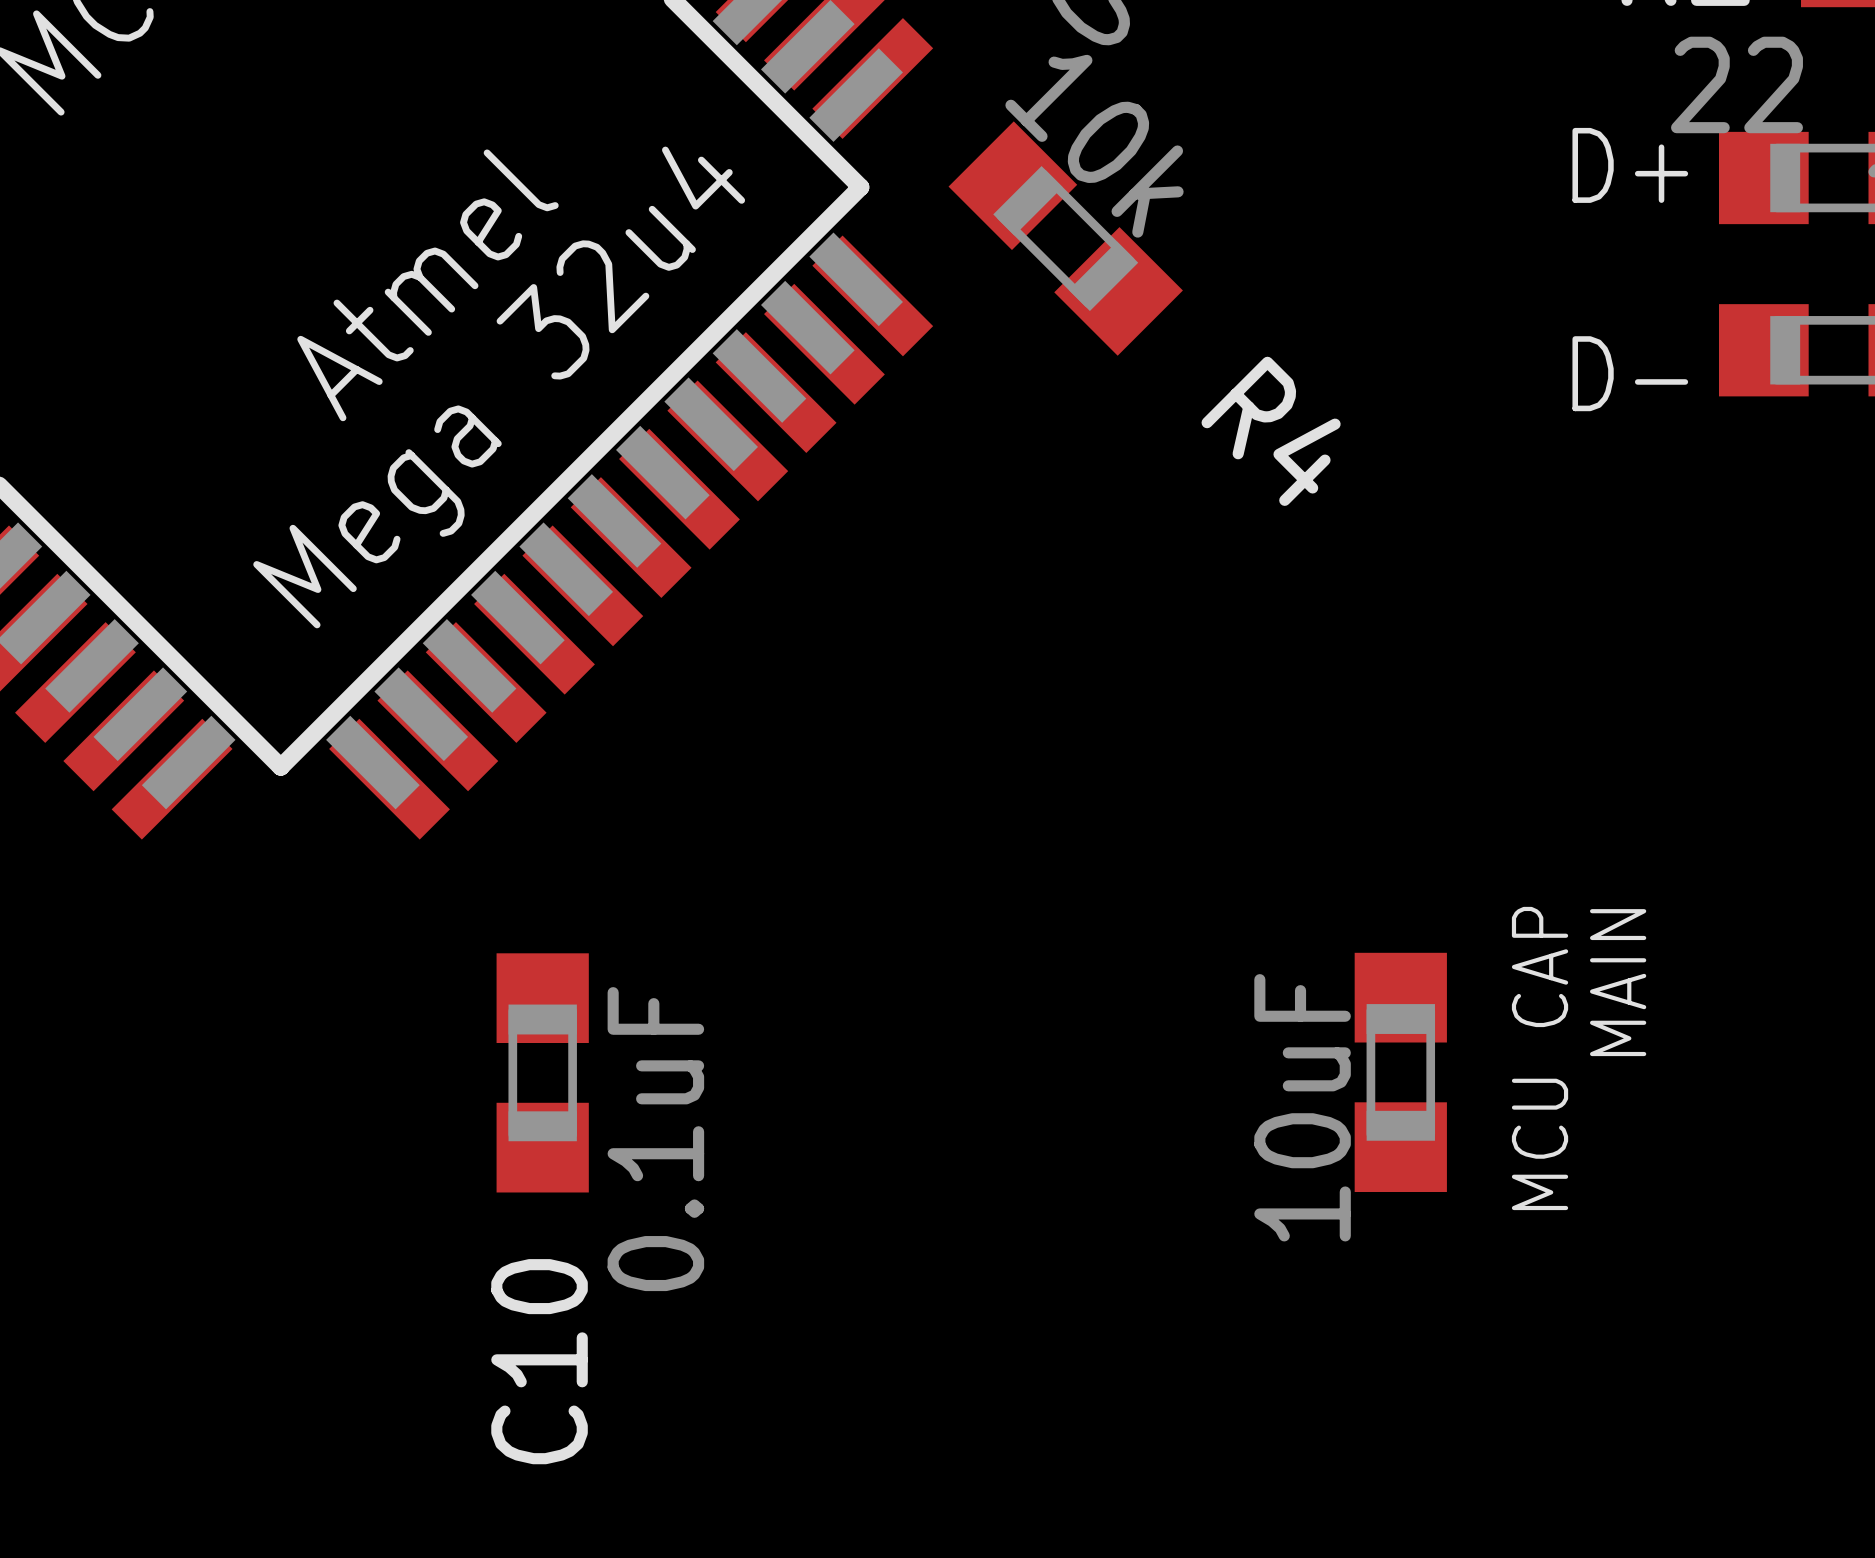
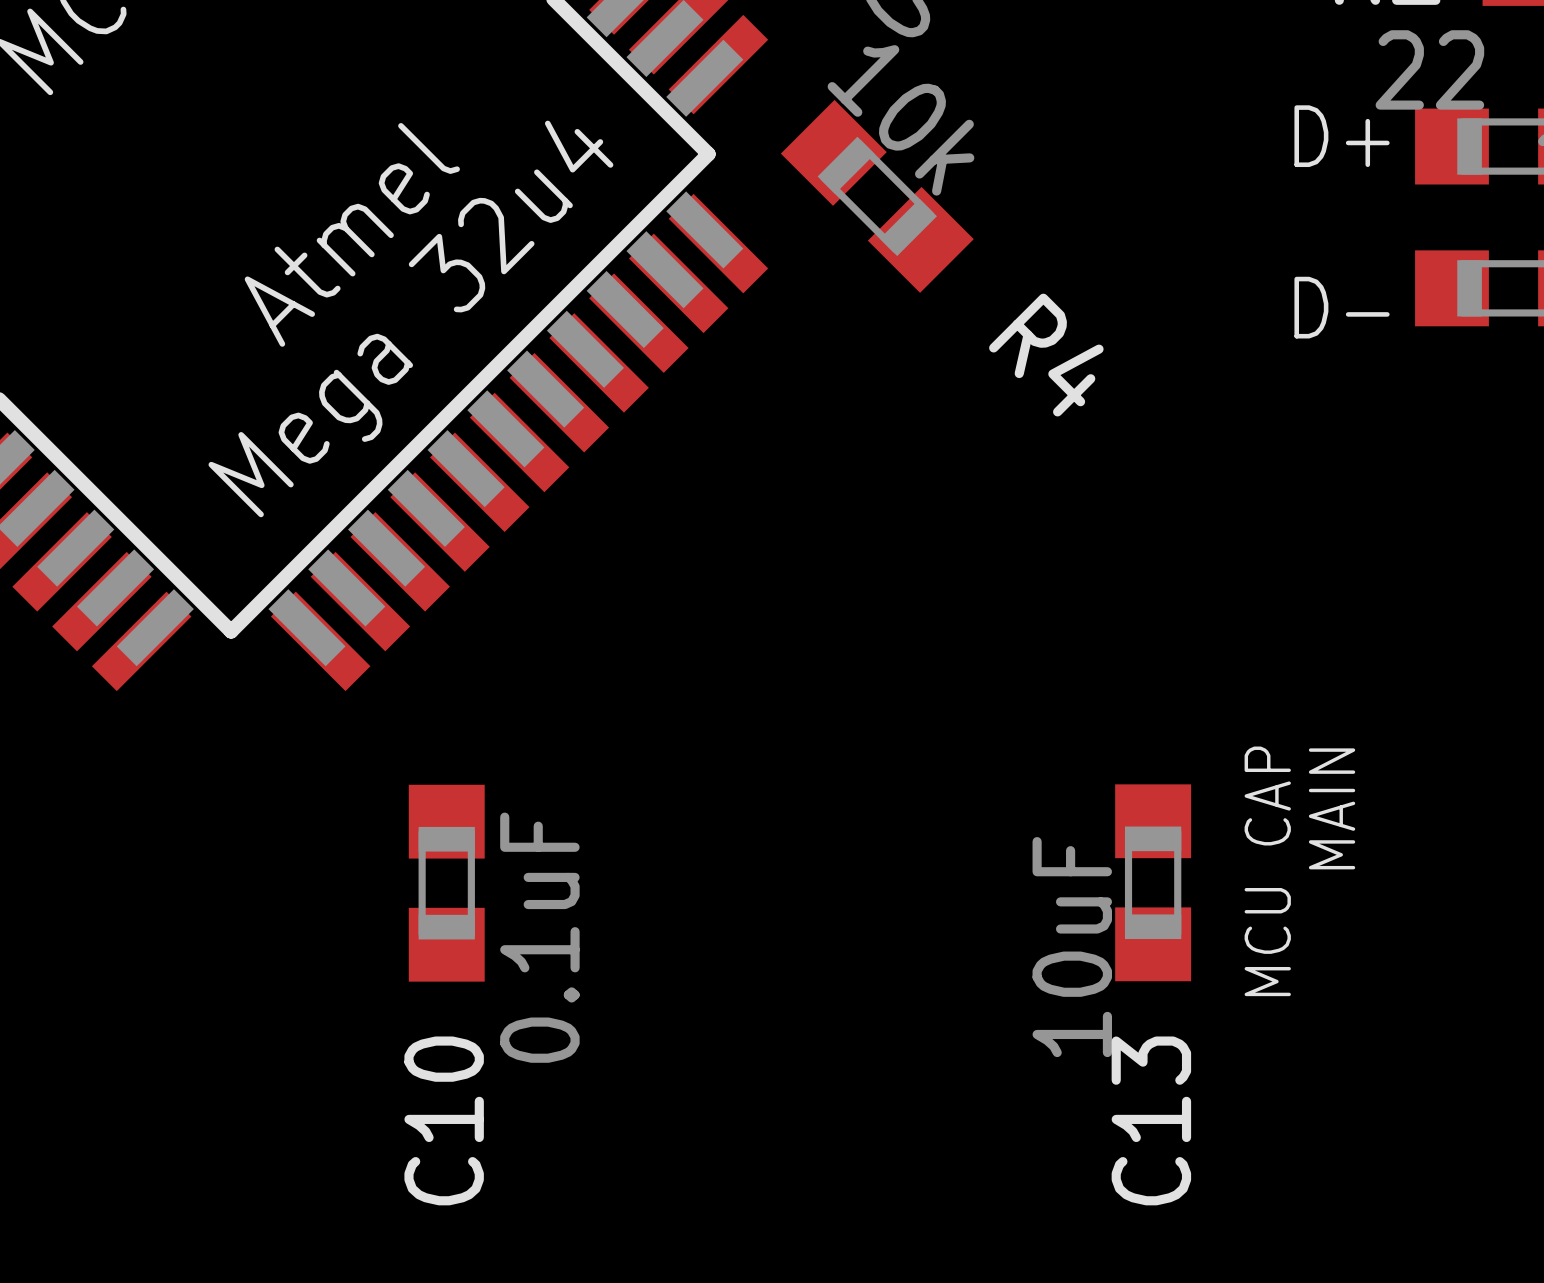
C13 value position: 10uF (1302, 1107) -> 10uF (1072, 947)
C13 name: none -> C13 (1151, 1120)

